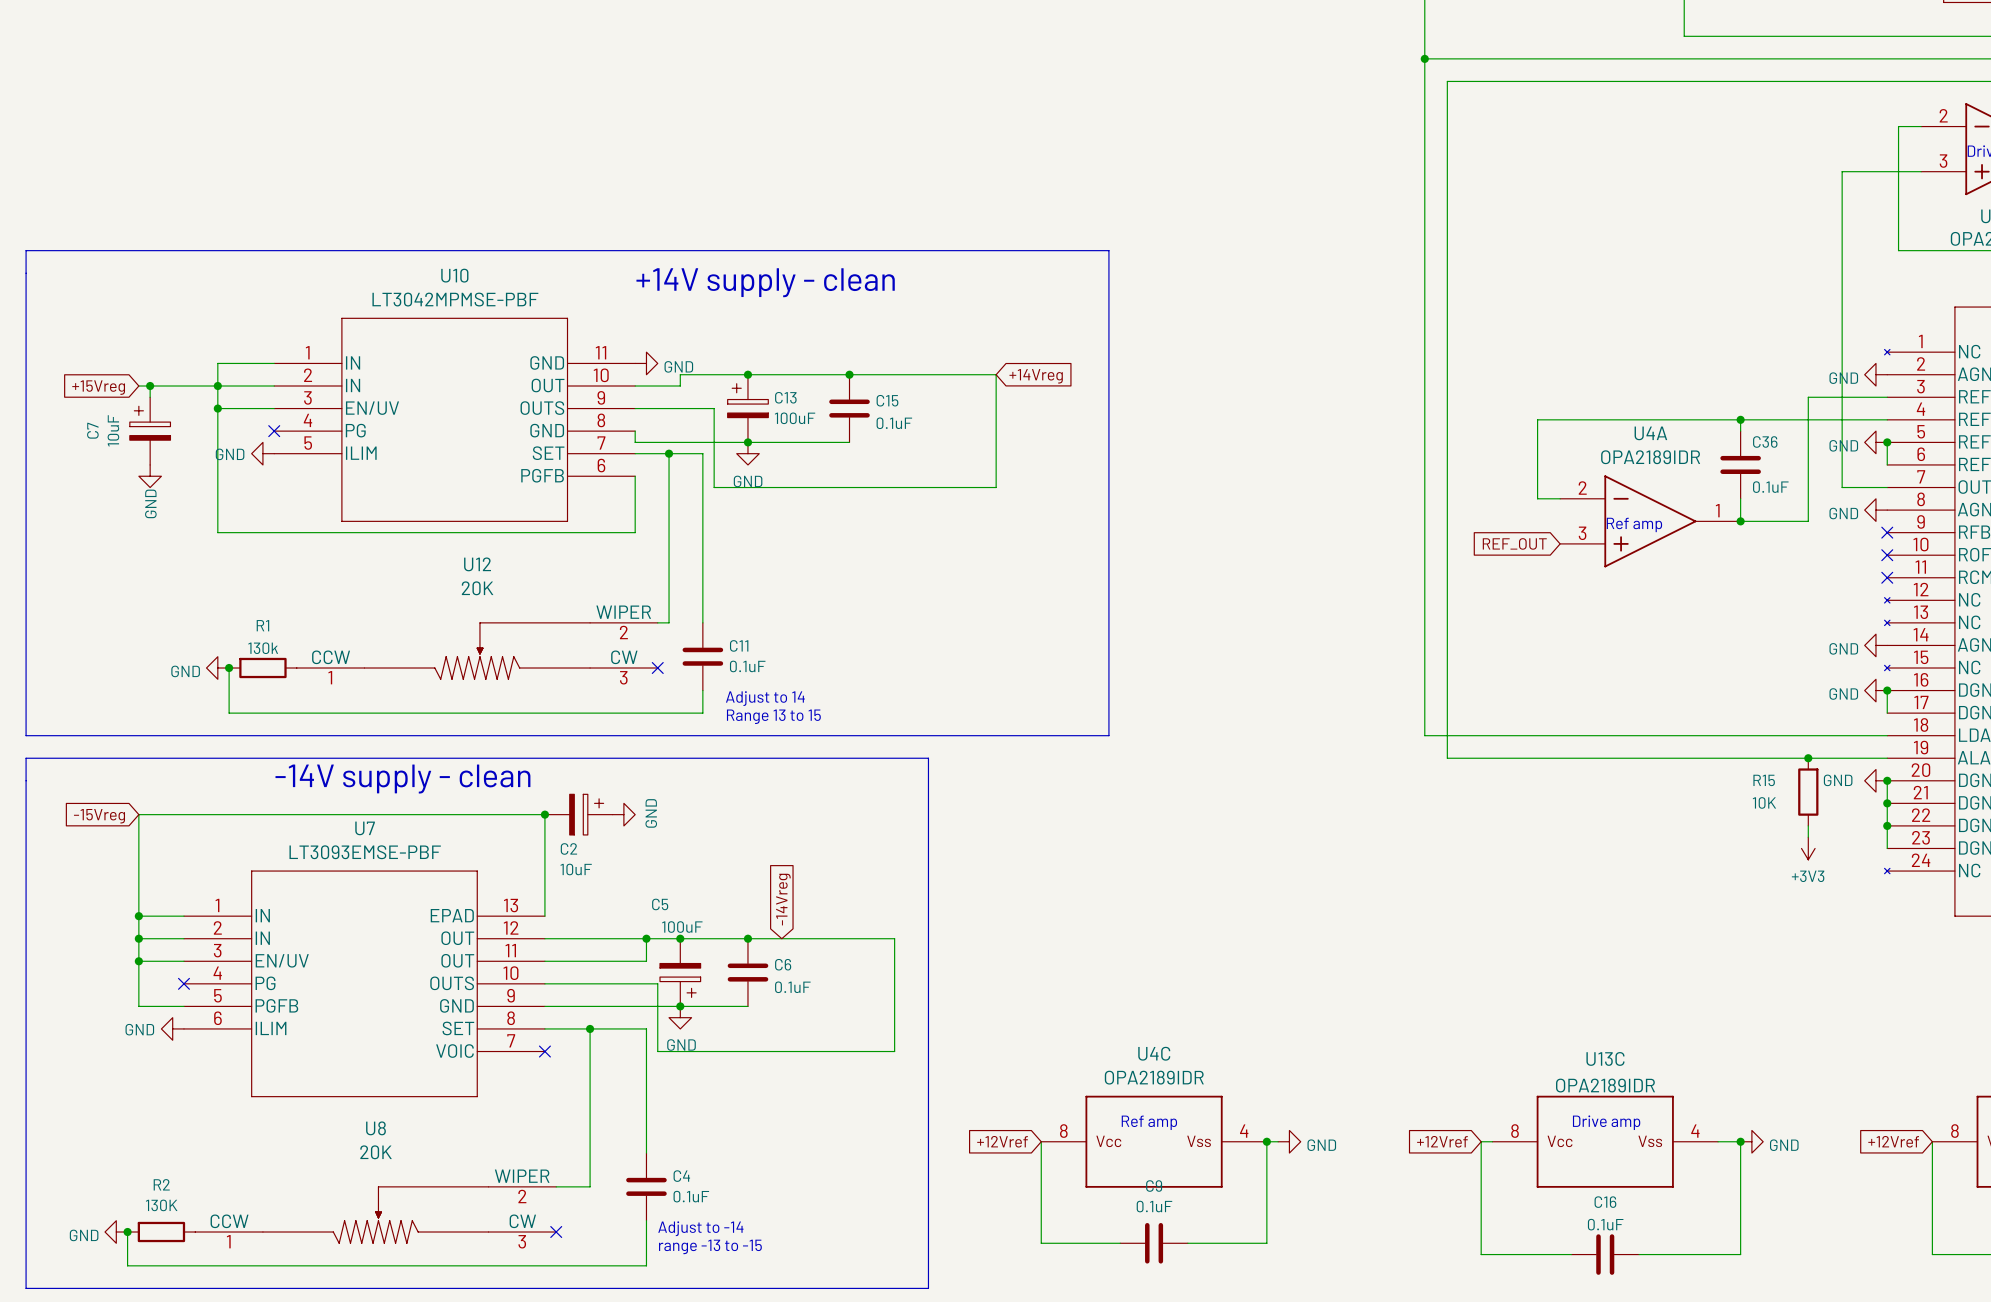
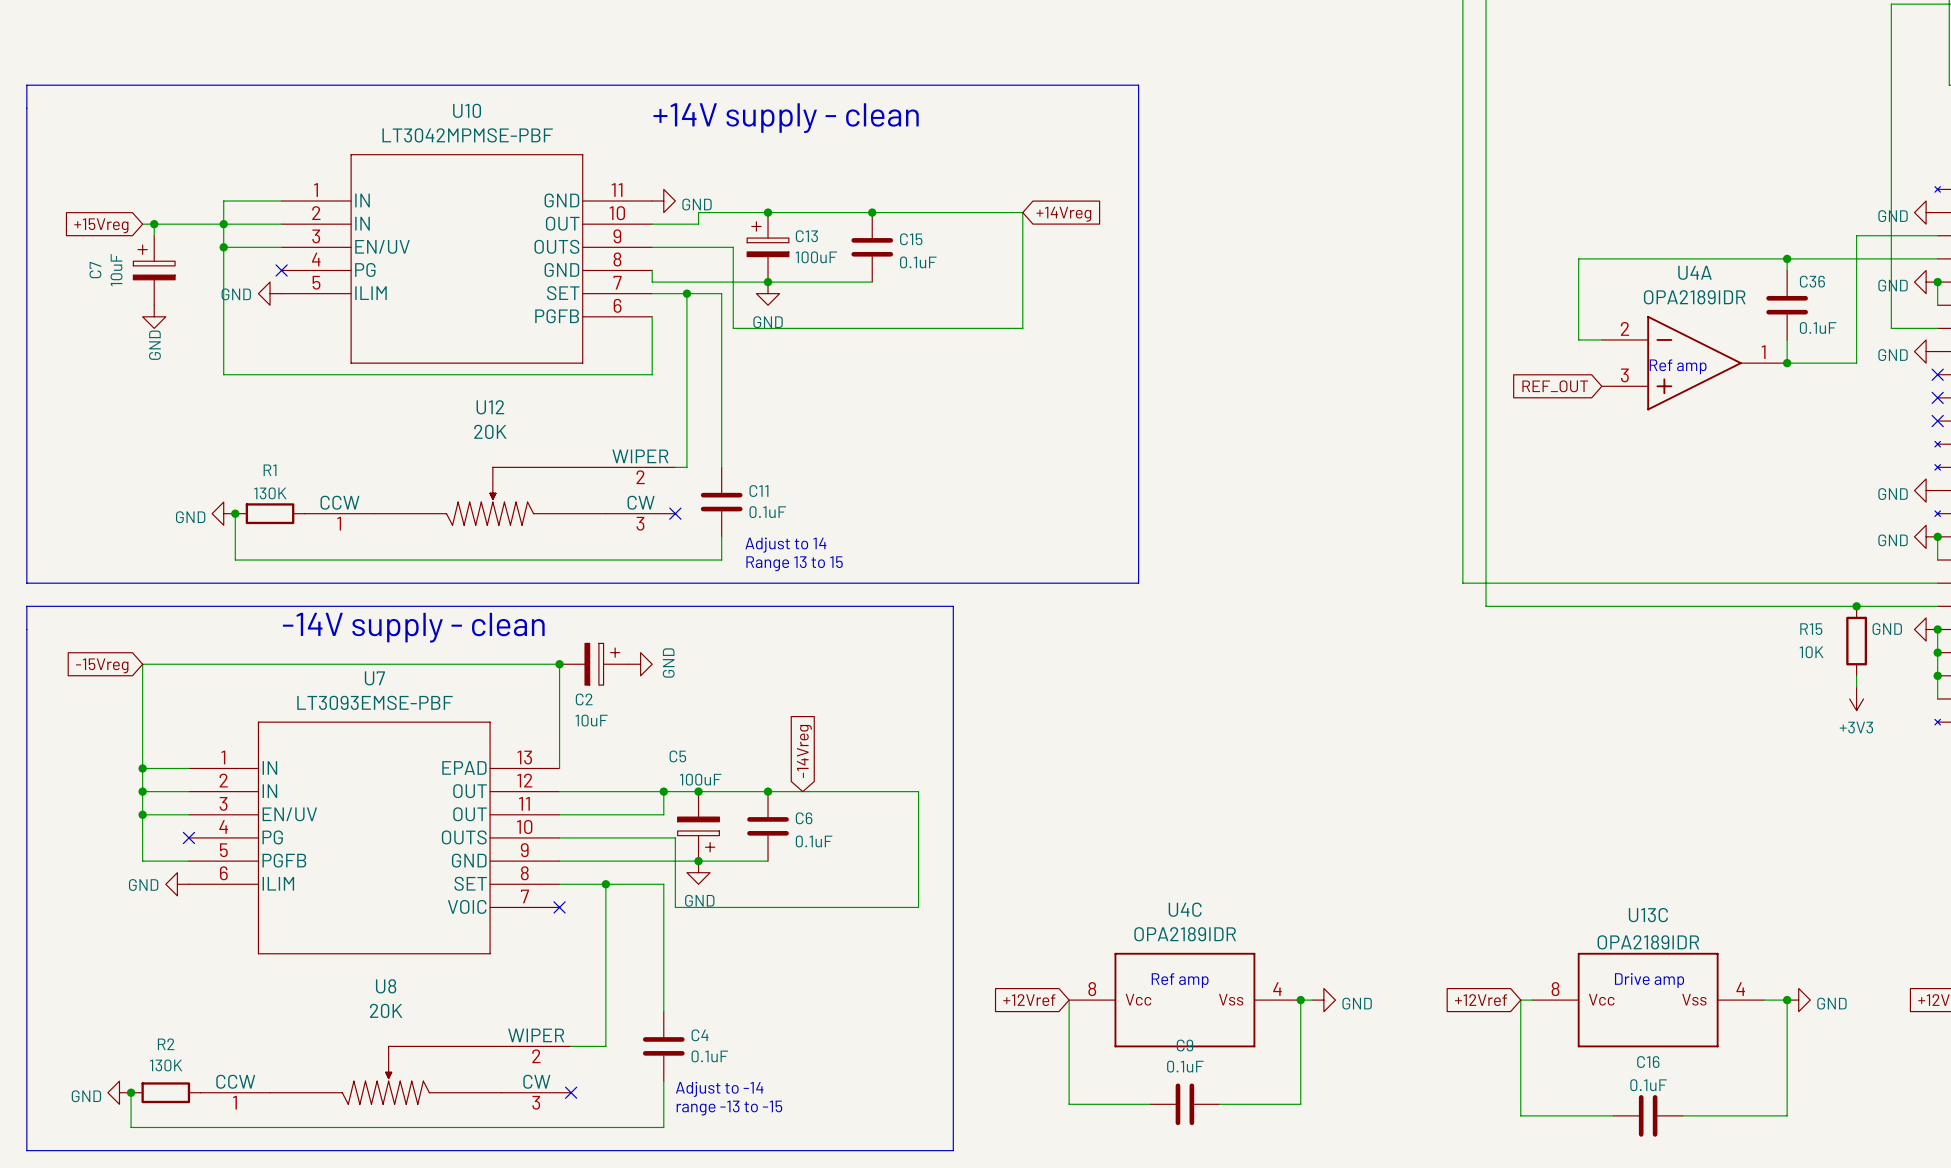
R1 value: 130k (263, 648) -> 130K (270, 493)

